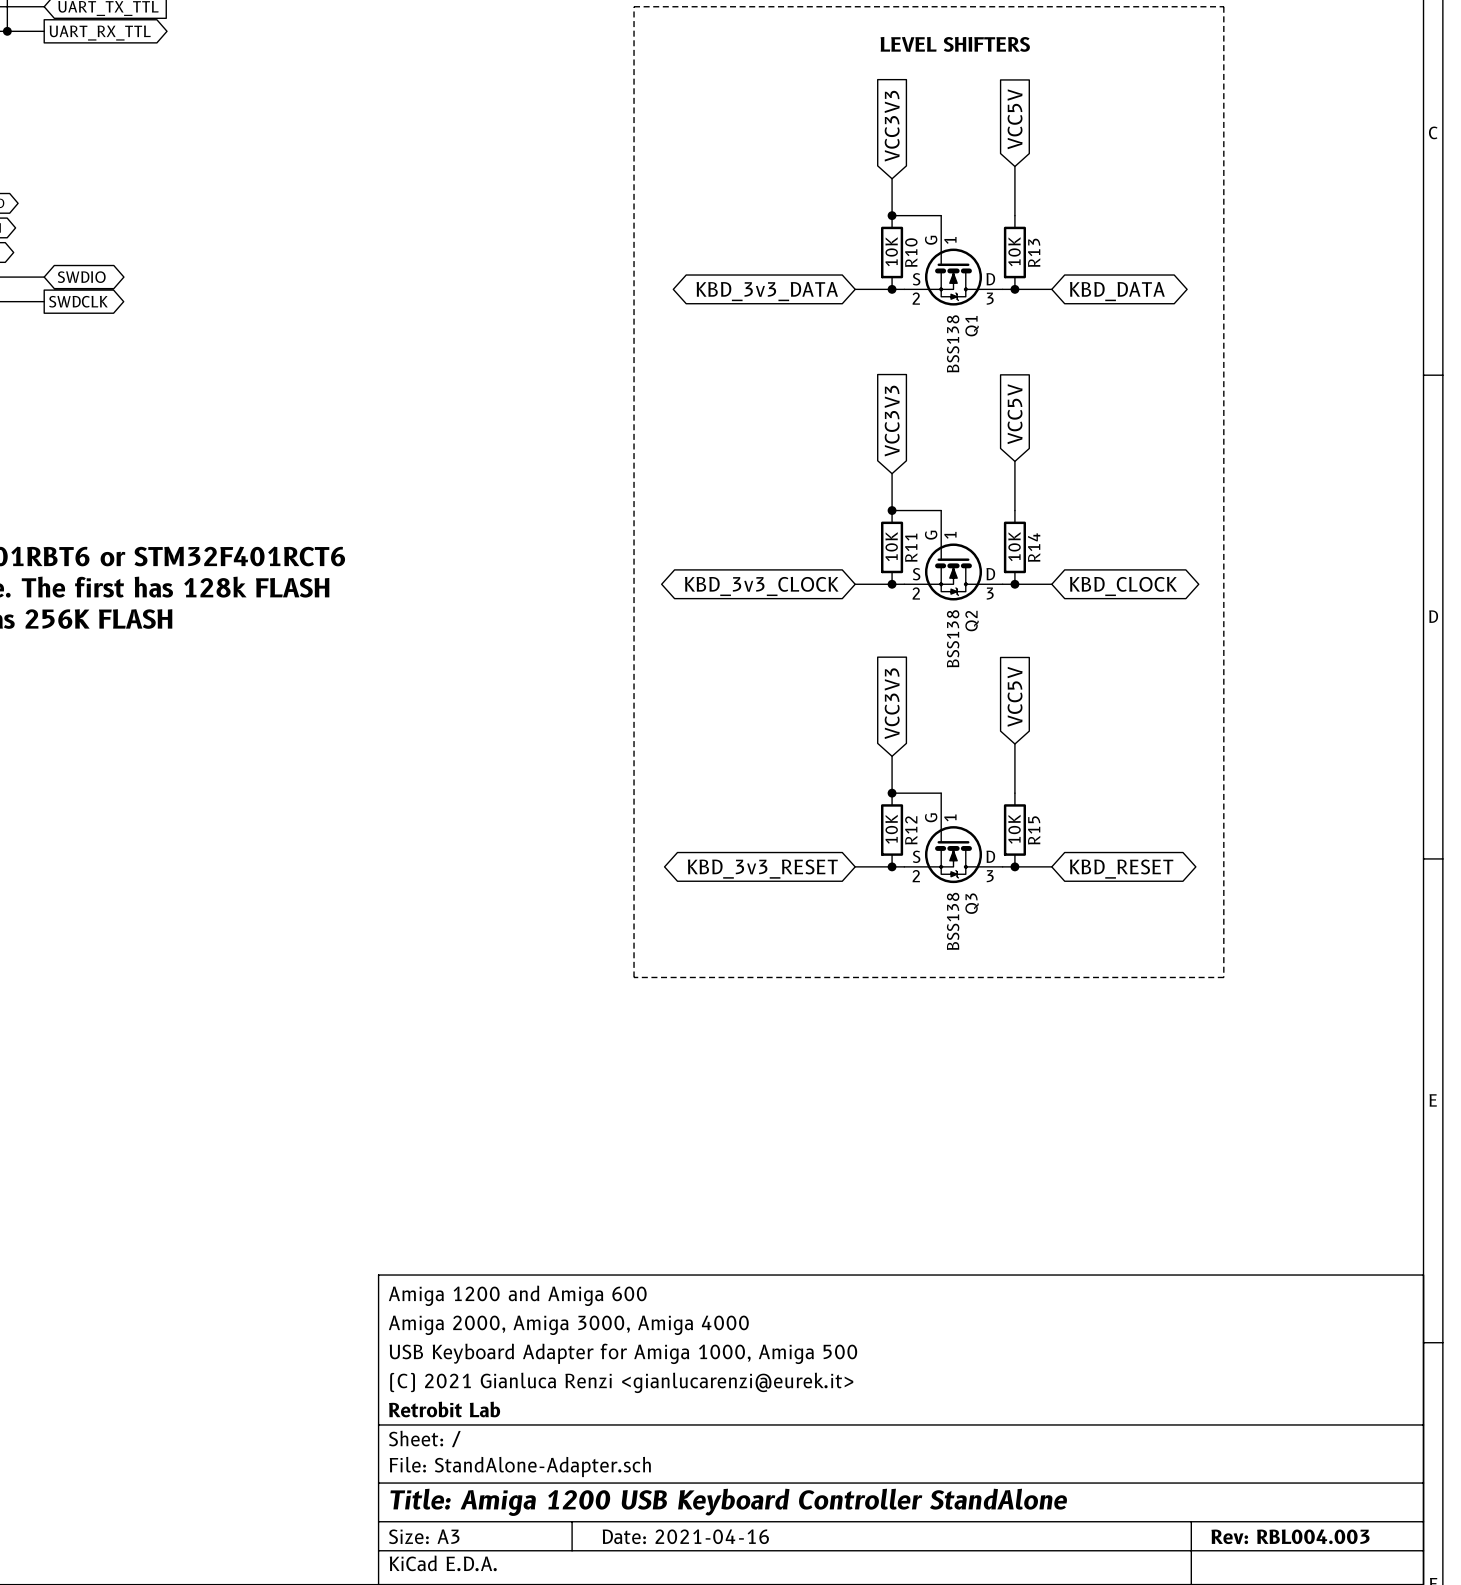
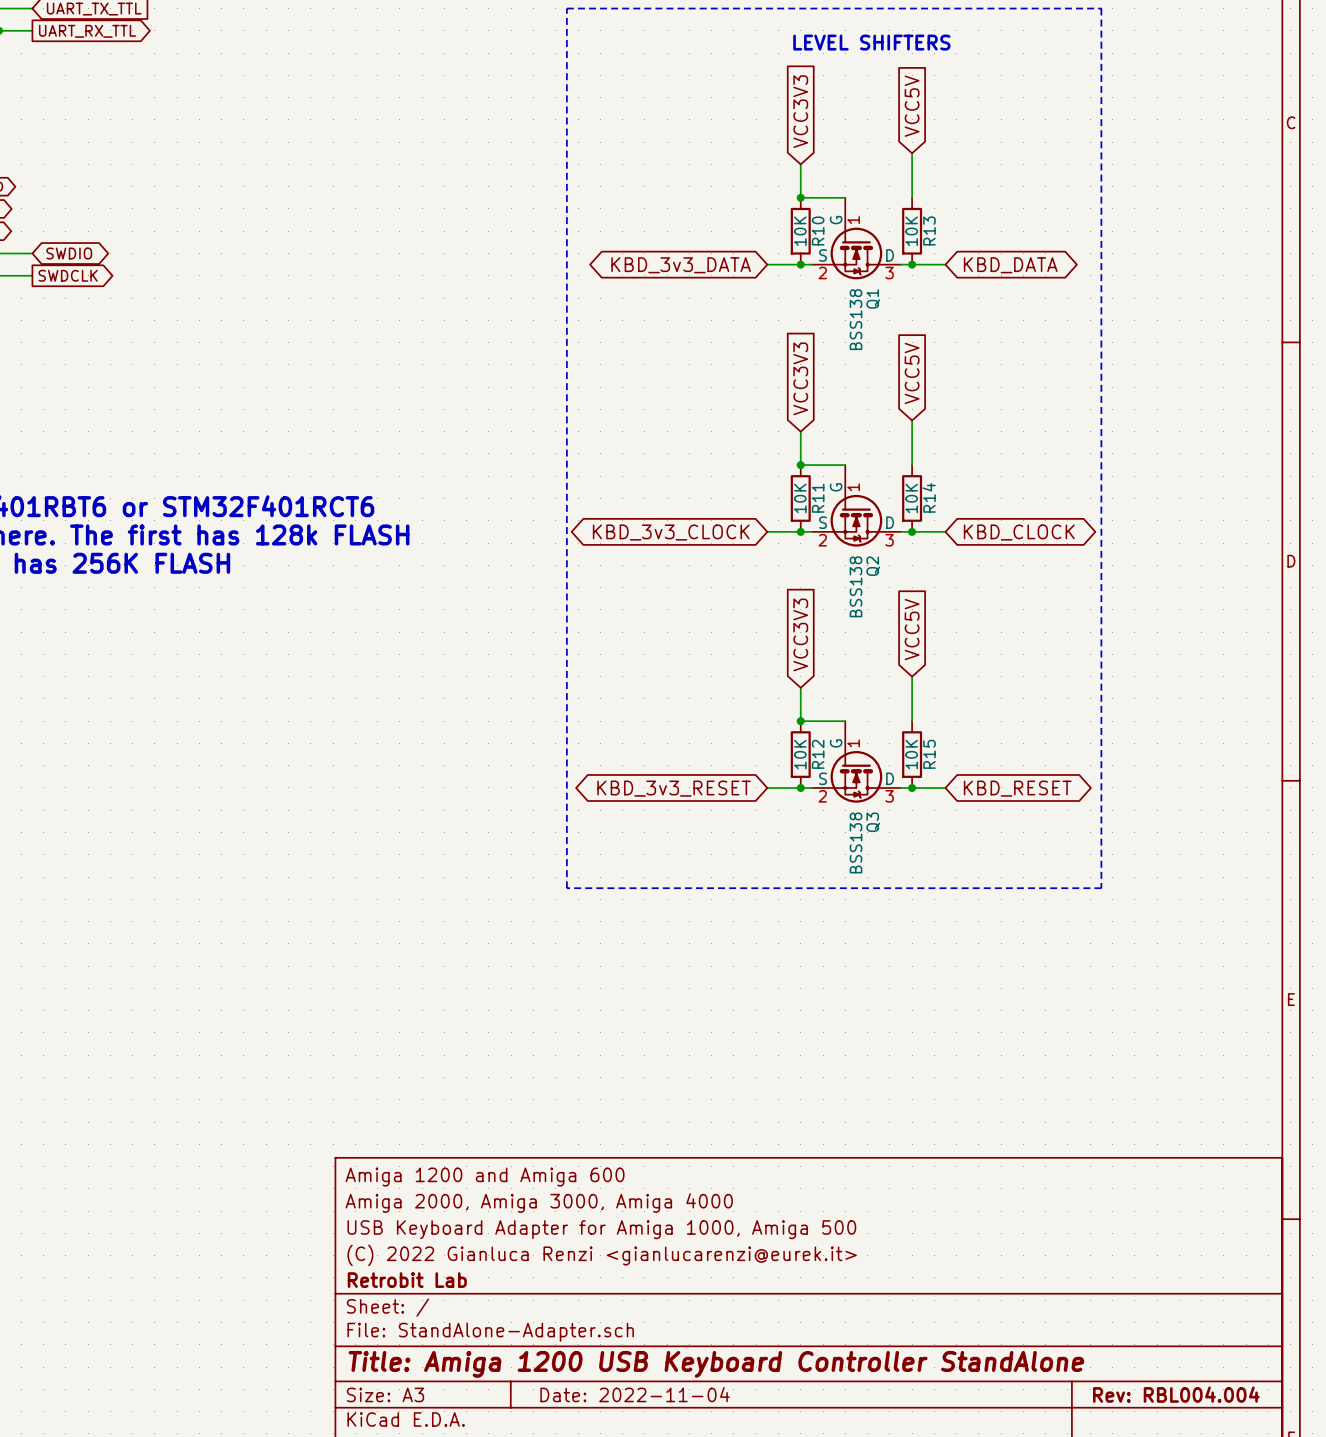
title block: (C) 2021 Gianluca Renzi <gianlucarenzi@eurek.it> (621, 1382) -> (C) 2022 Gianluca Renzi <gianlucarenzi@eurek.it> (602, 1255)
title block: Date: 2021-04-16 (685, 1536) -> Date: 2022-11-04 (635, 1394)
title block: Rev: RBL004.003 (1290, 1536) -> Rev: RBL004.004 (1176, 1394)

